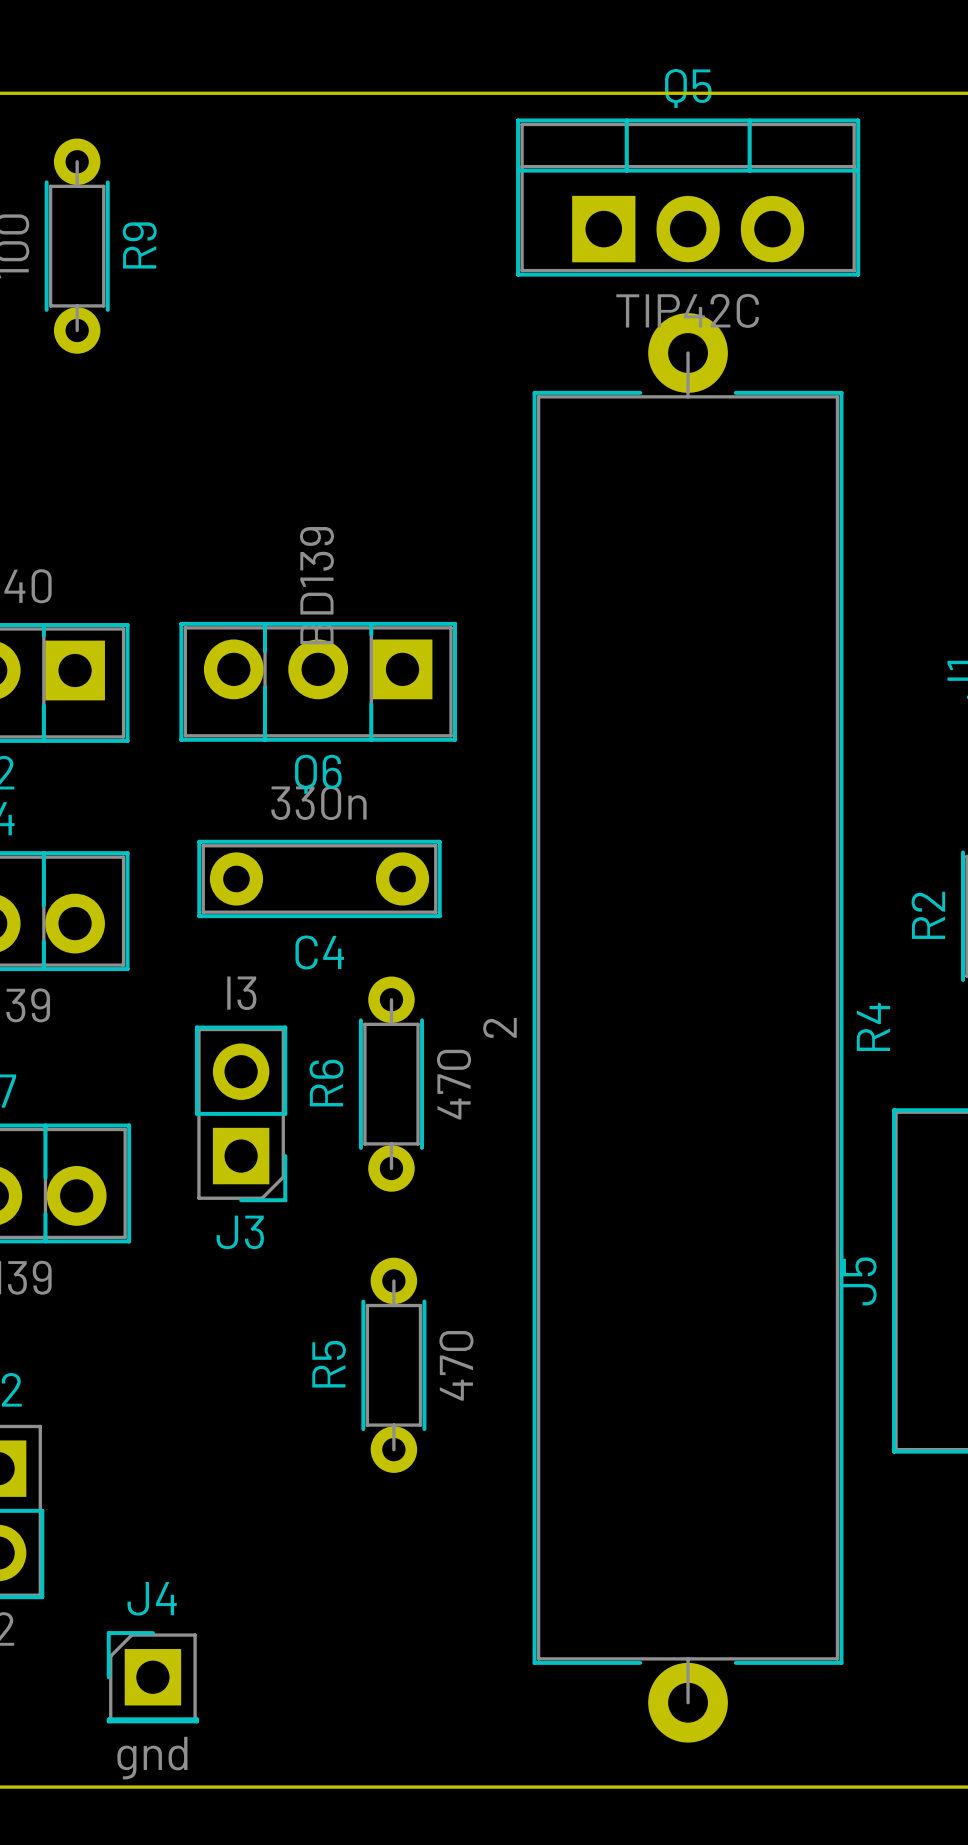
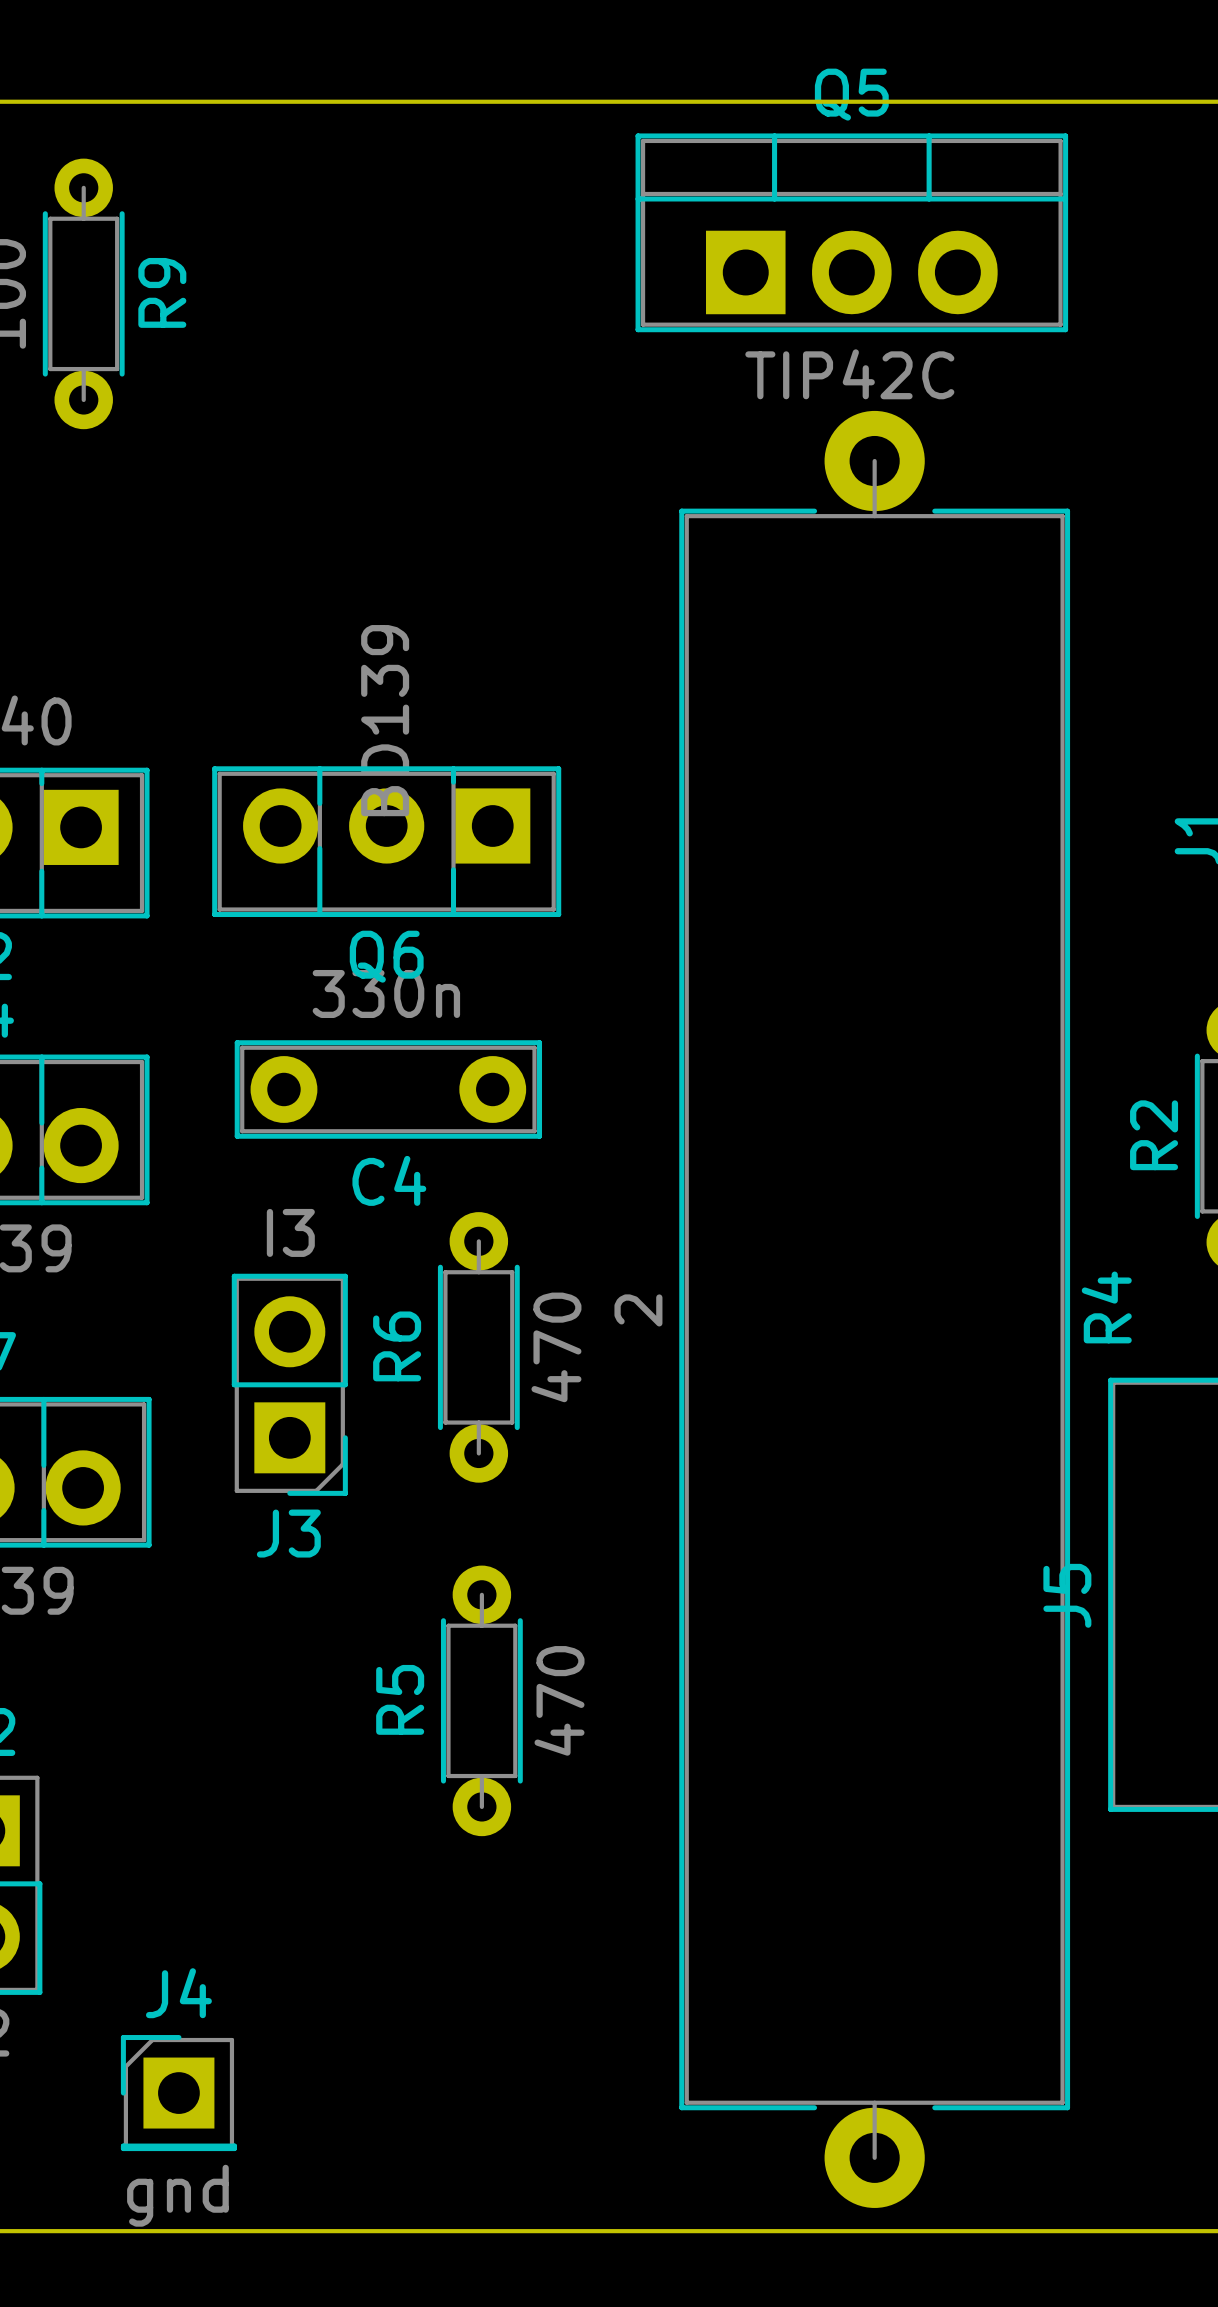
R4 position: (688, 1027) -> (874, 1309)

